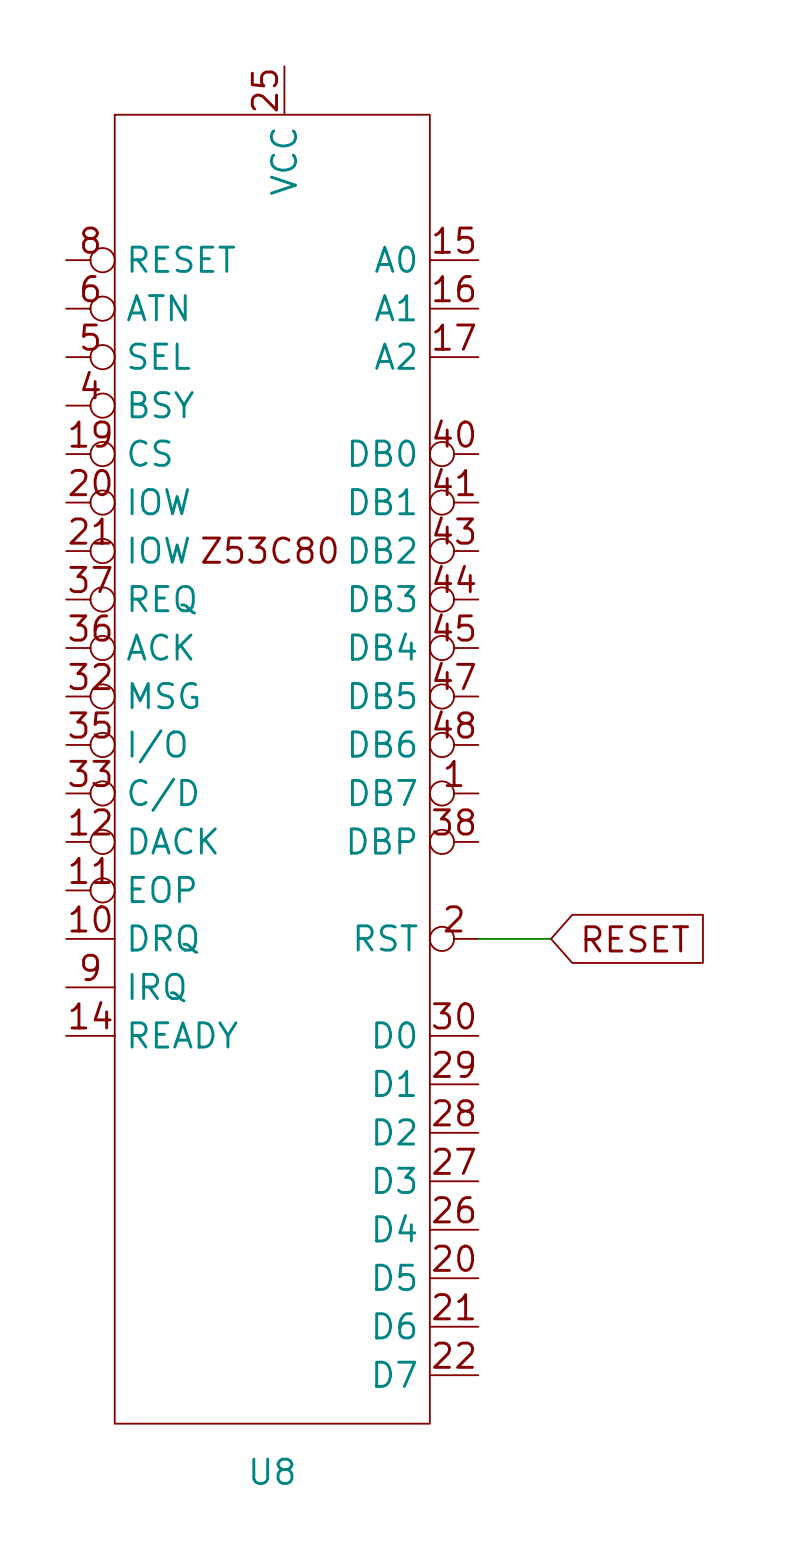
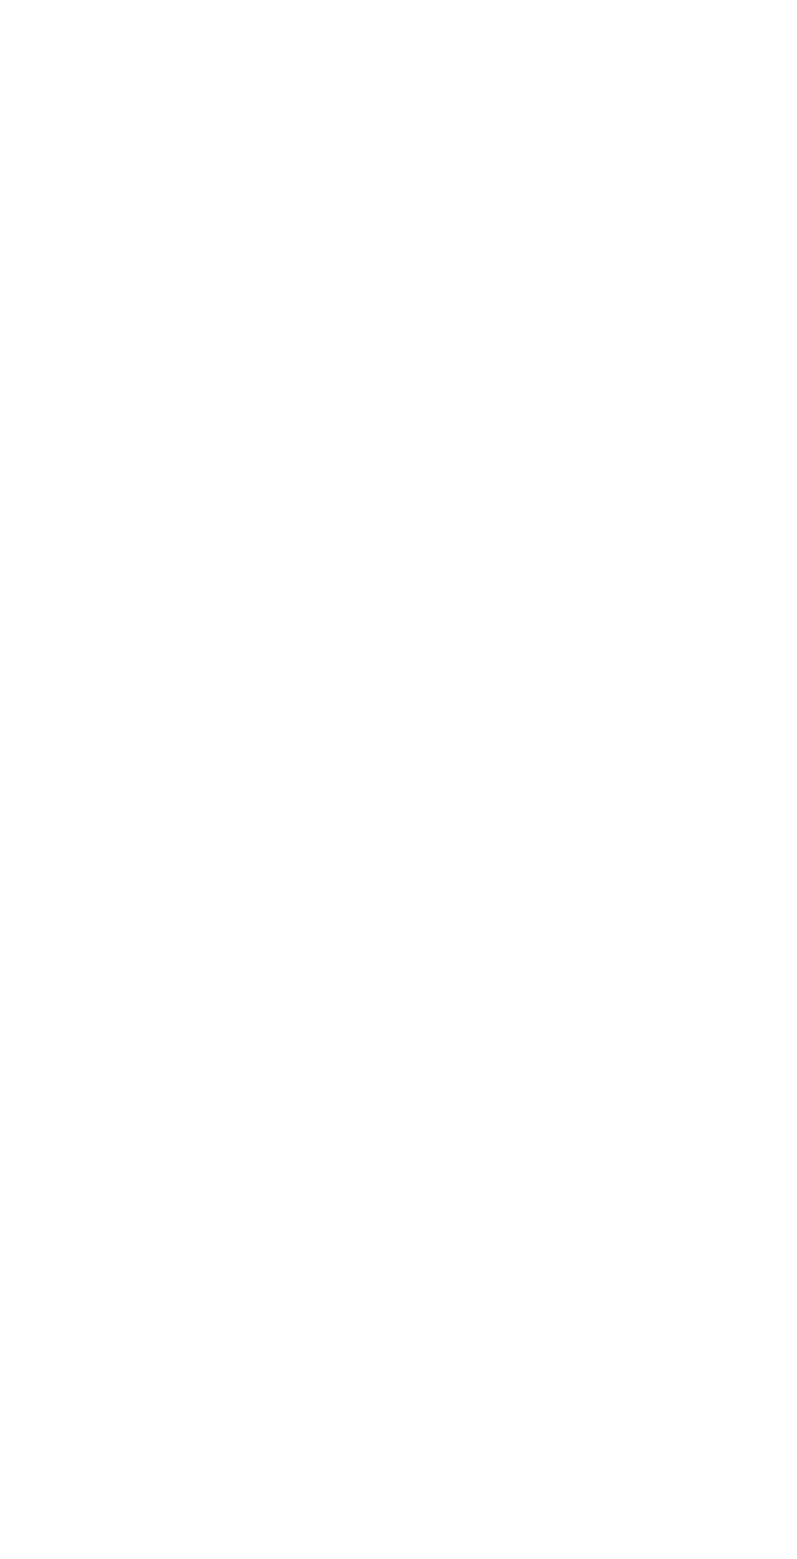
U8: (272, 744) -> none
wire: (478, 938) (551, 938) -> none
global label: RESET (636, 938) -> none

